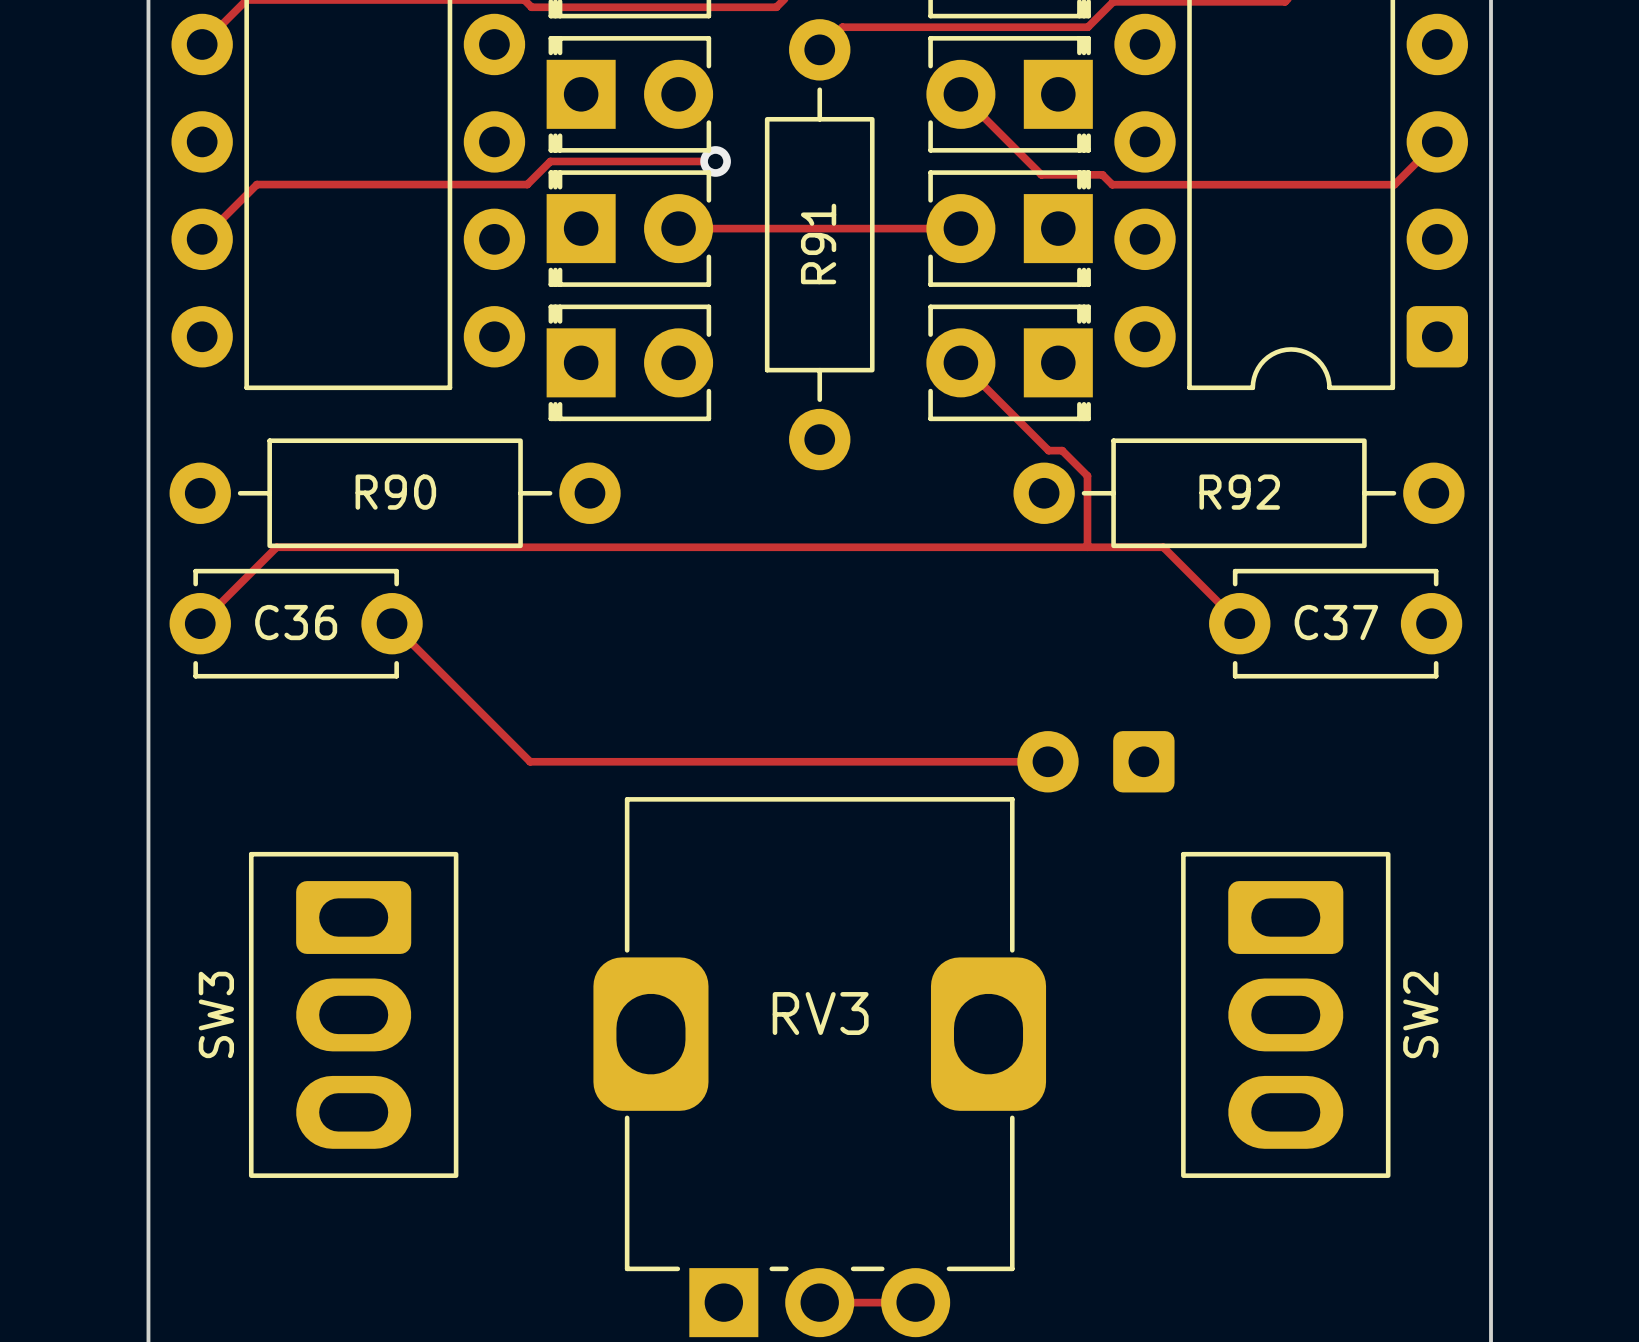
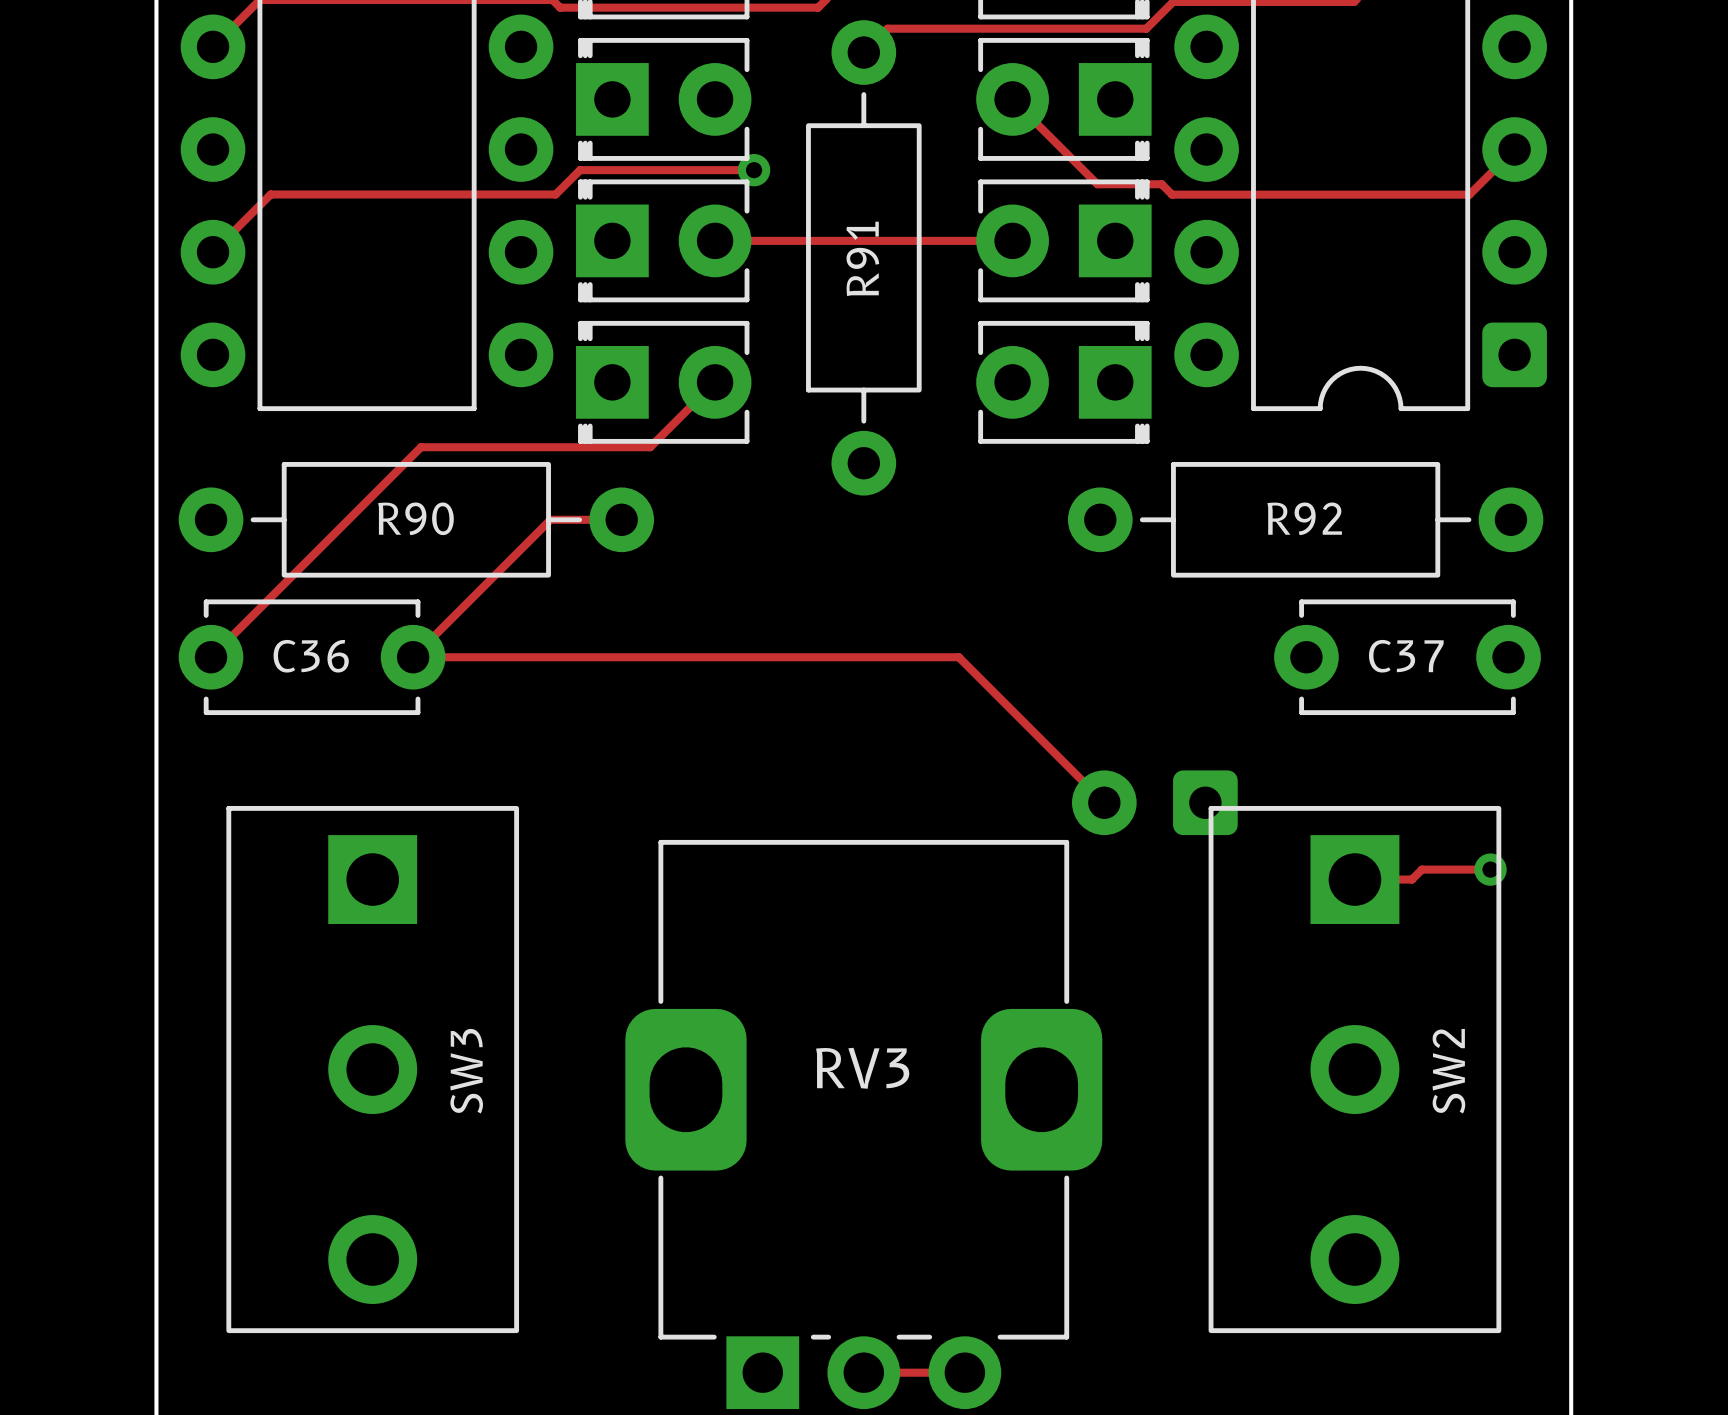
track: (960, 362) (1048, 450) (1062, 450) (1087, 475) (1087, 547) -> none
track: (276, 547) (1163, 547) (1239, 623) -> (291, 576) (421, 447) (650, 447) (715, 382)
track: (392, 623) (530, 761) (1047, 761) -> (621, 519) (550, 519) (413, 657) (958, 657) (1104, 802)
track: none -> (1490, 869) (1421, 869) (1412, 879) (1354, 879)
via: none -> (1490, 869)
SW3 footprint: [248, 851, 459, 1178] -> [226, 805, 520, 1334]
SW2 footprint: [1181, 851, 1391, 1178] -> [1208, 805, 1502, 1334]
SW3 name position: SW3 (216, 1014) -> SW3 (466, 1071)

